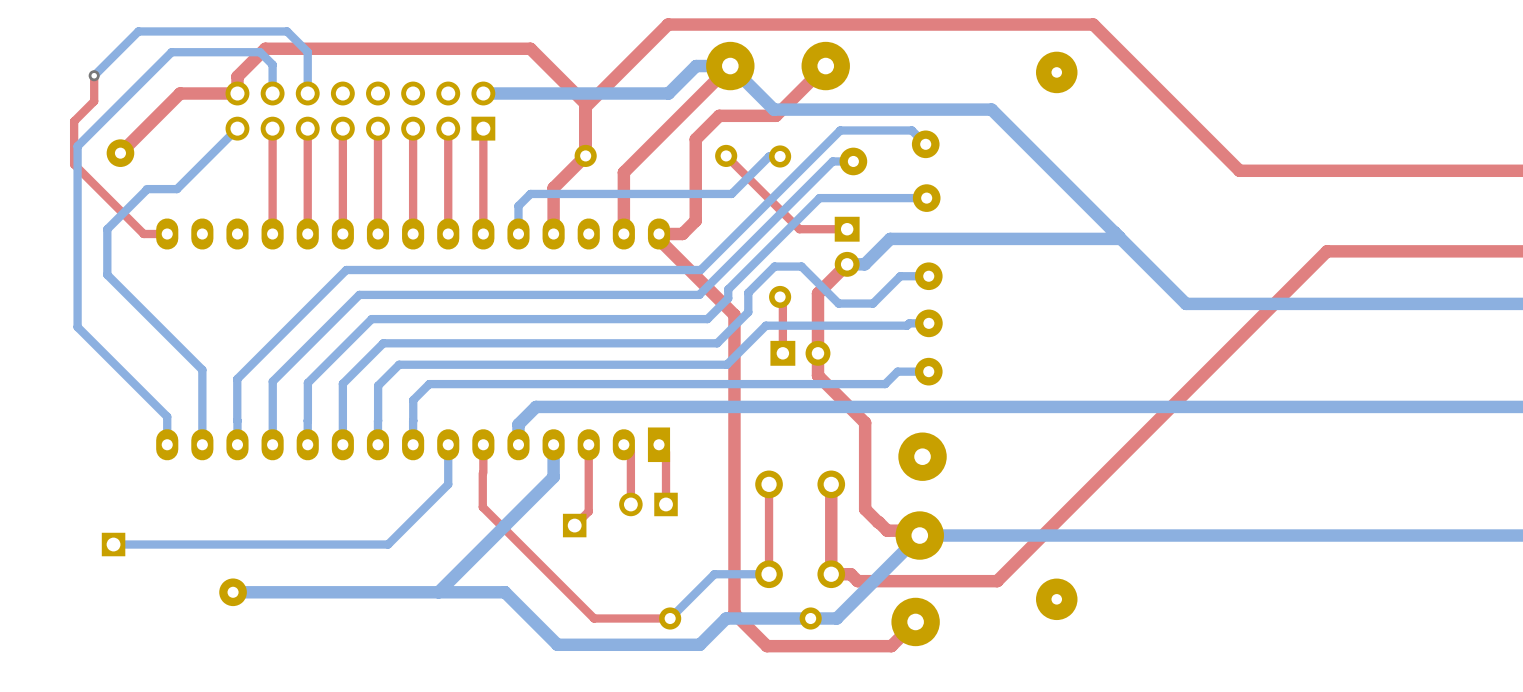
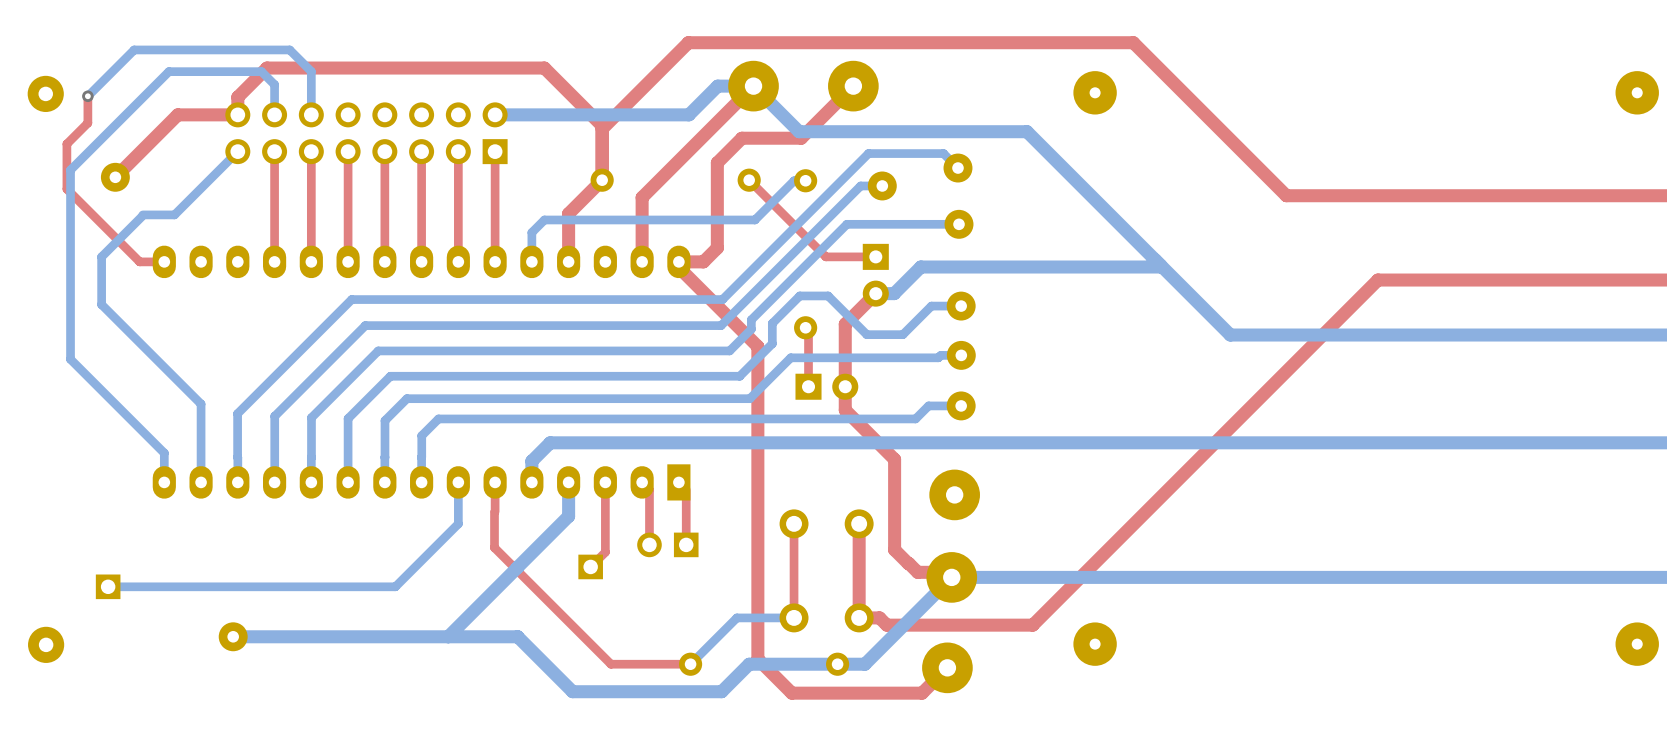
part: none -> (45, 93)
part: none -> (46, 644)

